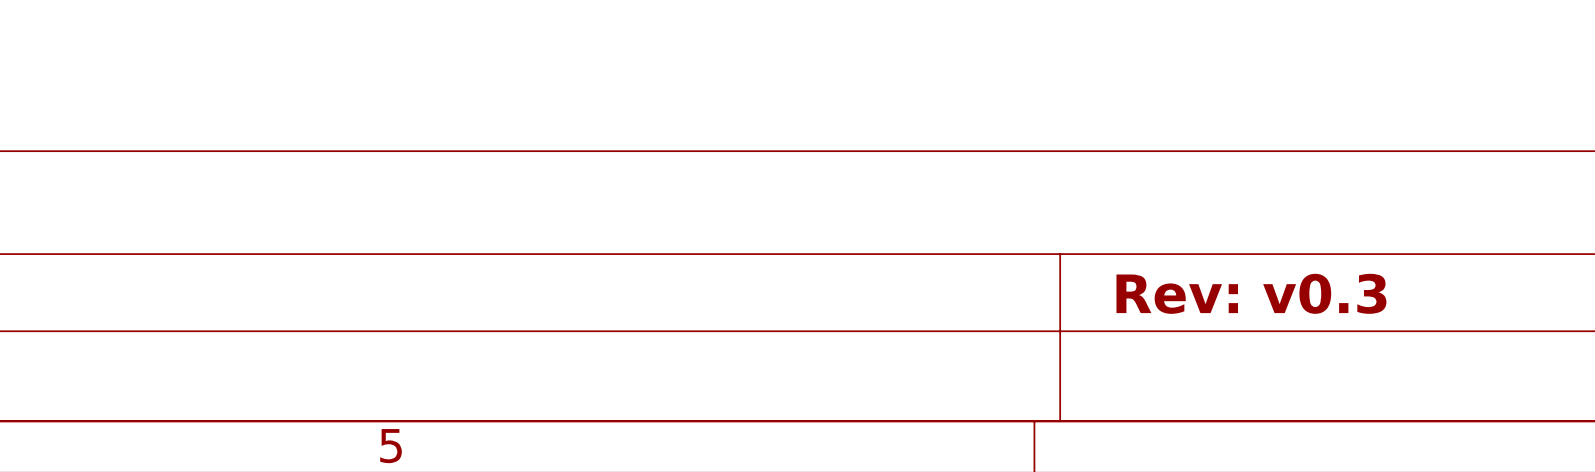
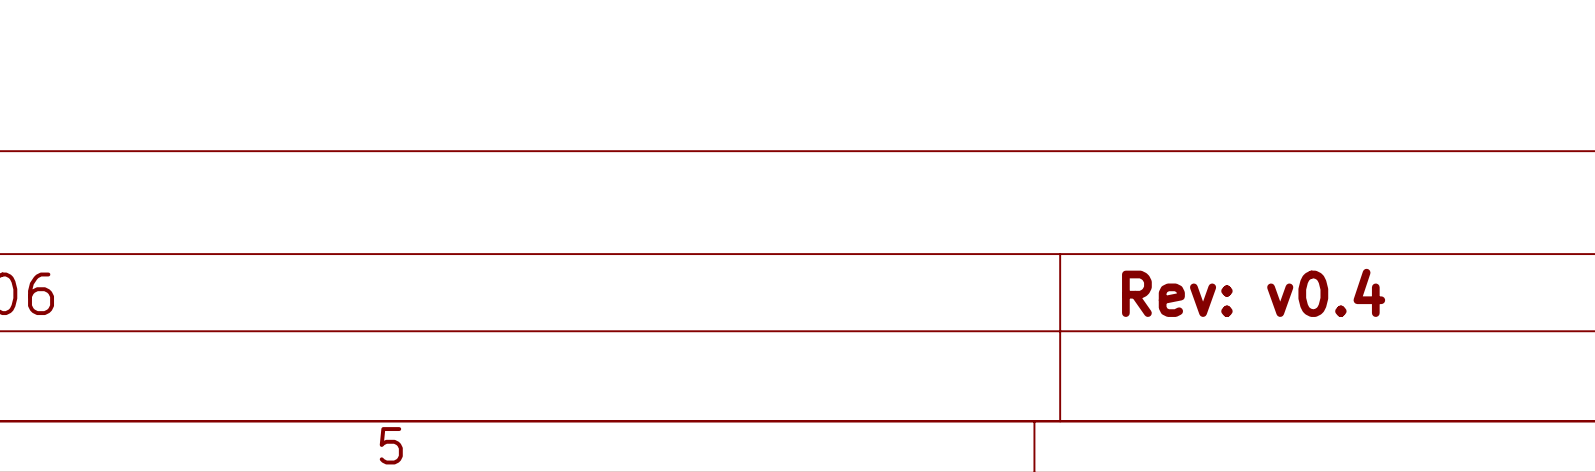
title block: Rev: v0.3 (1251, 293) -> Rev: v0.4 (1253, 292)

